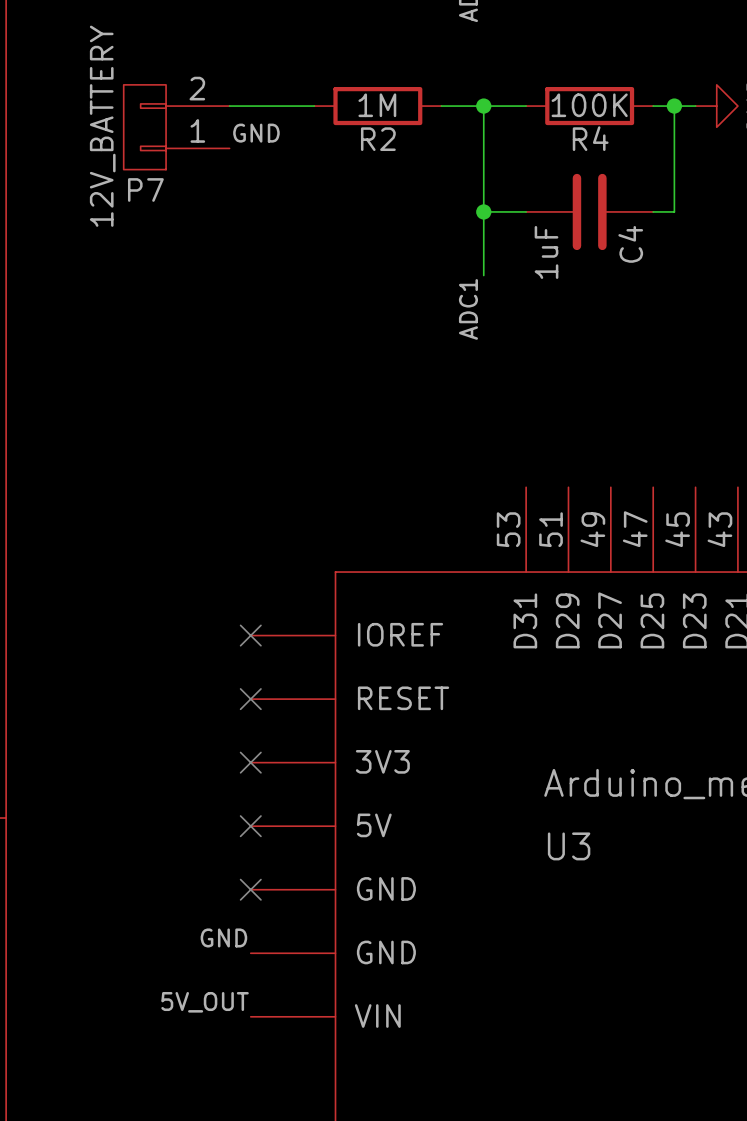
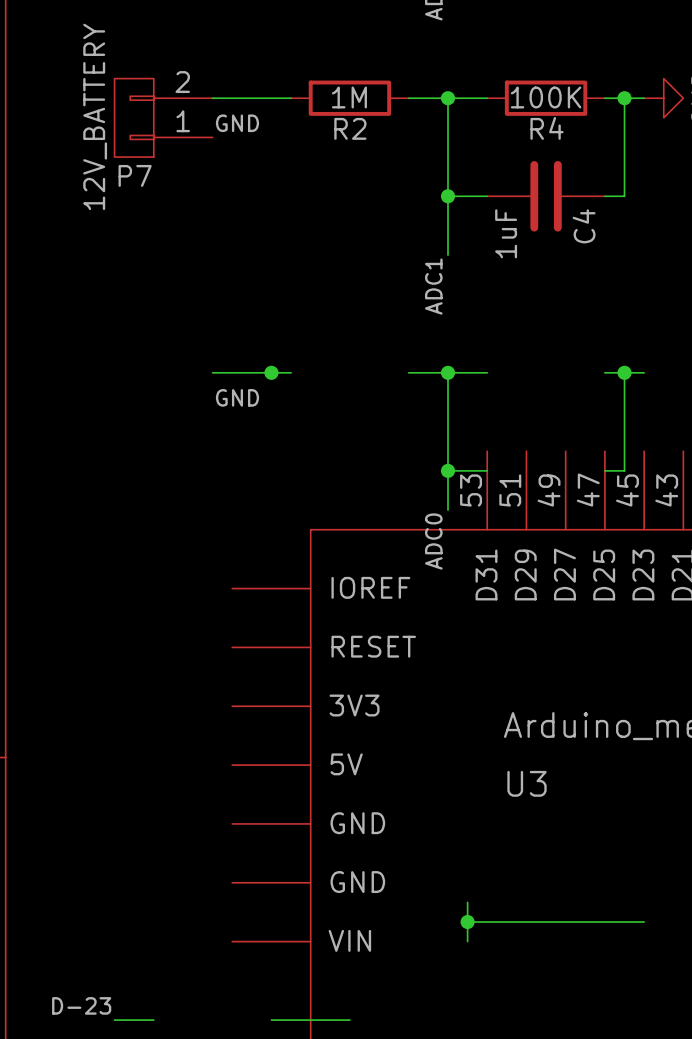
wire: none -> (212, 372) (291, 372)
junction: none -> (271, 372)
wire: none -> (408, 372) (487, 372)
wire: none -> (447, 372) (447, 510)
junction: none -> (447, 372)
wire: none -> (604, 372) (644, 372)
wire: none -> (624, 372) (624, 470) (604, 470)
junction: none -> (624, 372)
label: none -> GND (237, 397)
wire: none -> (447, 470) (487, 470)
junction: none -> (447, 470)
label: none -> ADC0 (433, 541)
no-connect mark: (250, 635) -> none
no-connect mark: (250, 699) -> none
no-connect mark: (250, 762) -> none
no-connect mark: (250, 826) -> none
no-connect mark: (250, 889) -> none
label: GND (223, 937) -> none
wire: none -> (467, 902) (467, 941)
wire: none -> (467, 922) (644, 922)
junction: none -> (467, 922)
label: 5V_OUT (205, 1002) -> none
label: none -> D-23 (81, 1005)
wire: none -> (114, 1020) (153, 1020)
wire: none -> (271, 1020) (349, 1020)

